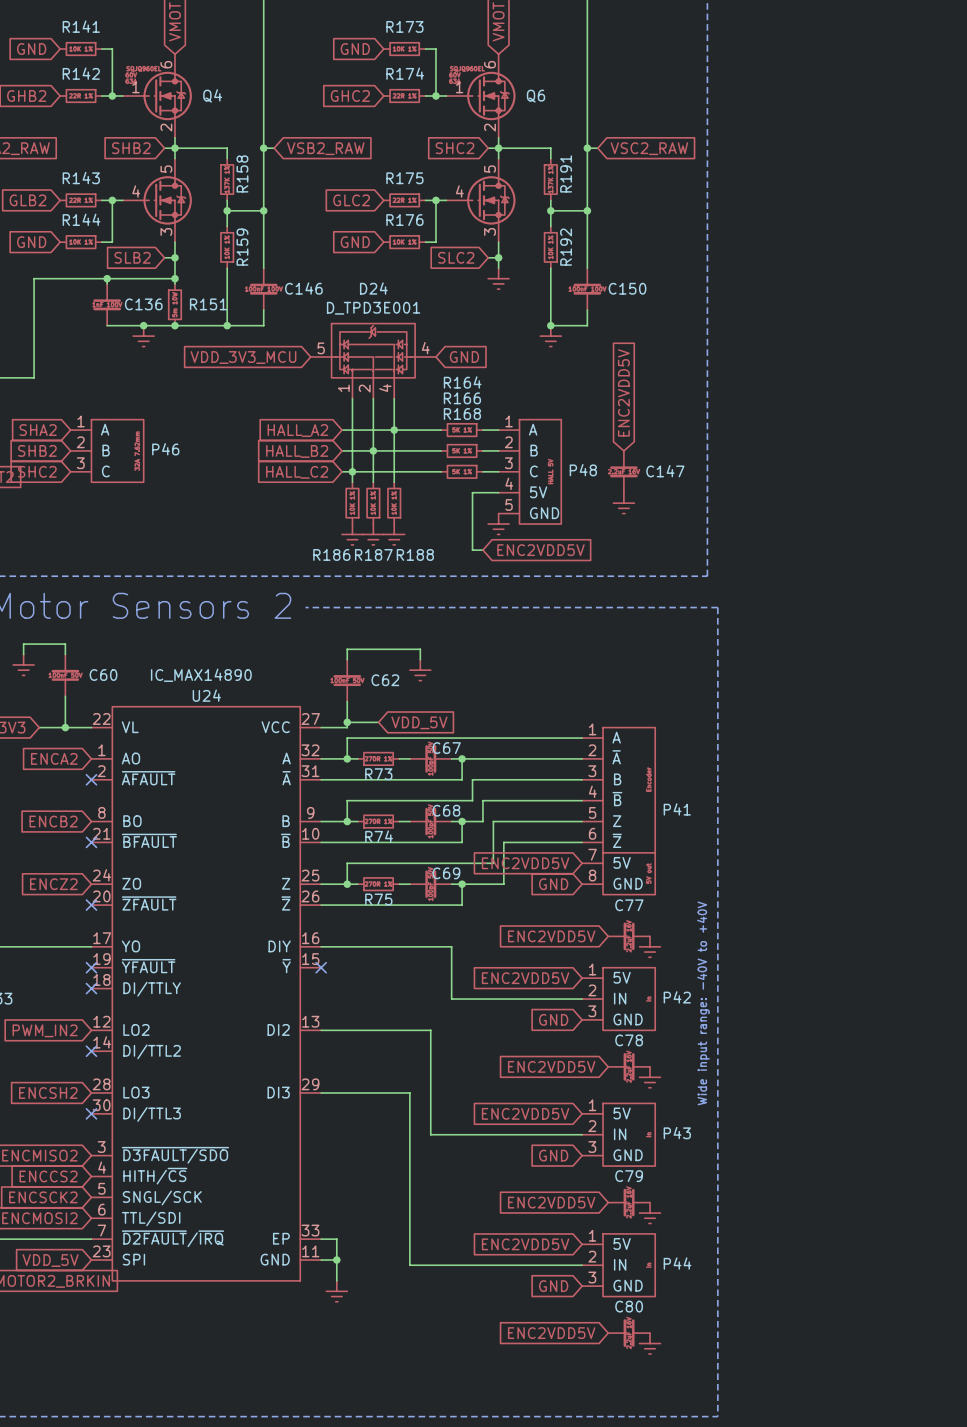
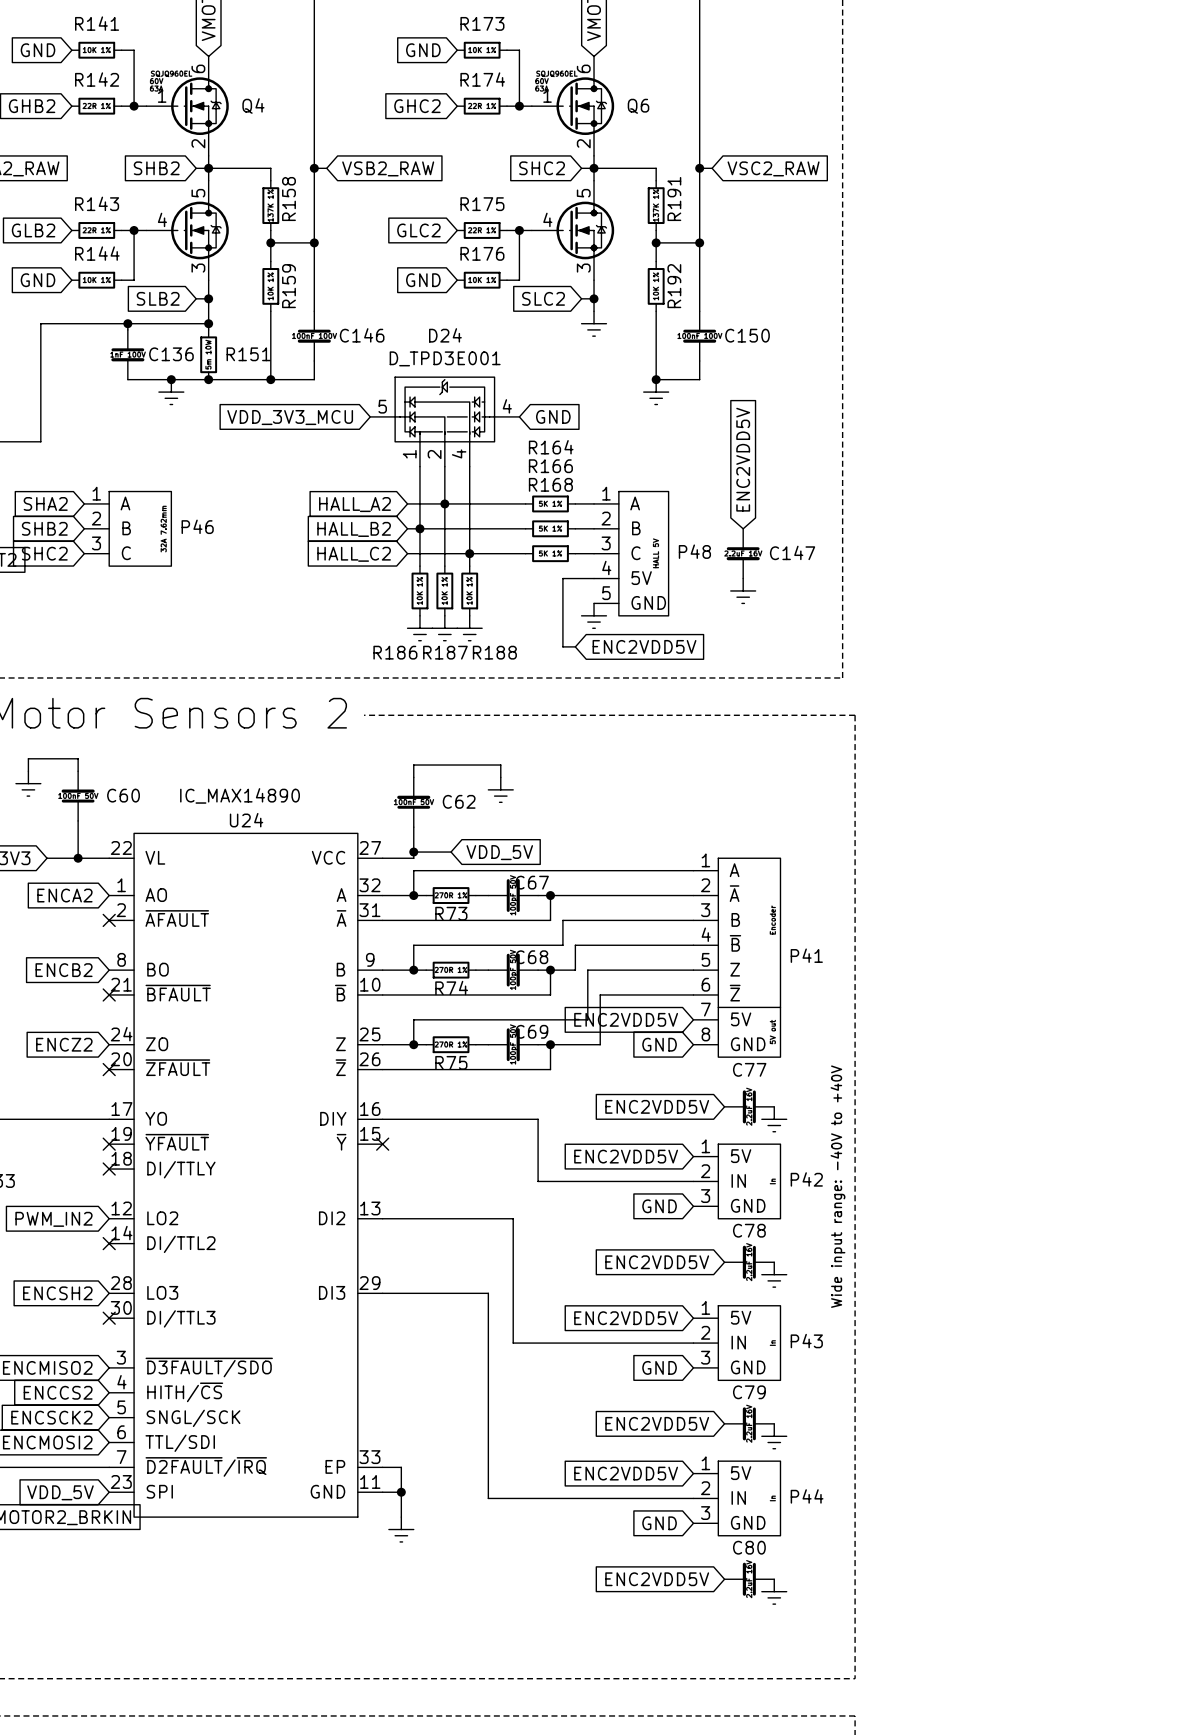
junction: none -> (444, 503)
junction: (394, 430) -> none
junction: none -> (419, 528)
junction: (373, 450) -> none
junction: (352, 471) -> none
junction: none -> (469, 553)

